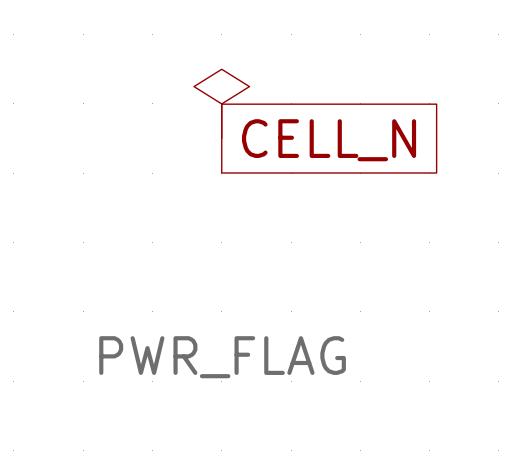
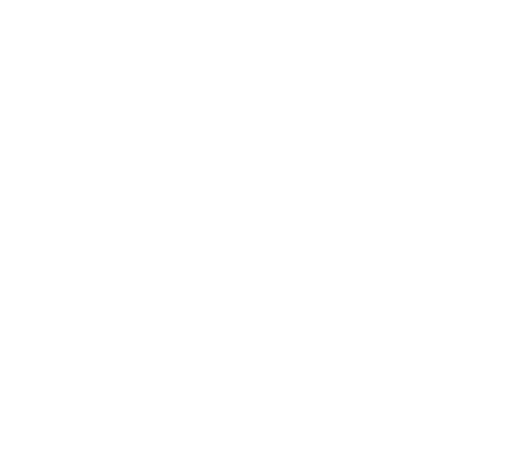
power symbol: PWR_FLAG (221, 103) -> none
global label: CELL_N (329, 140) -> none

